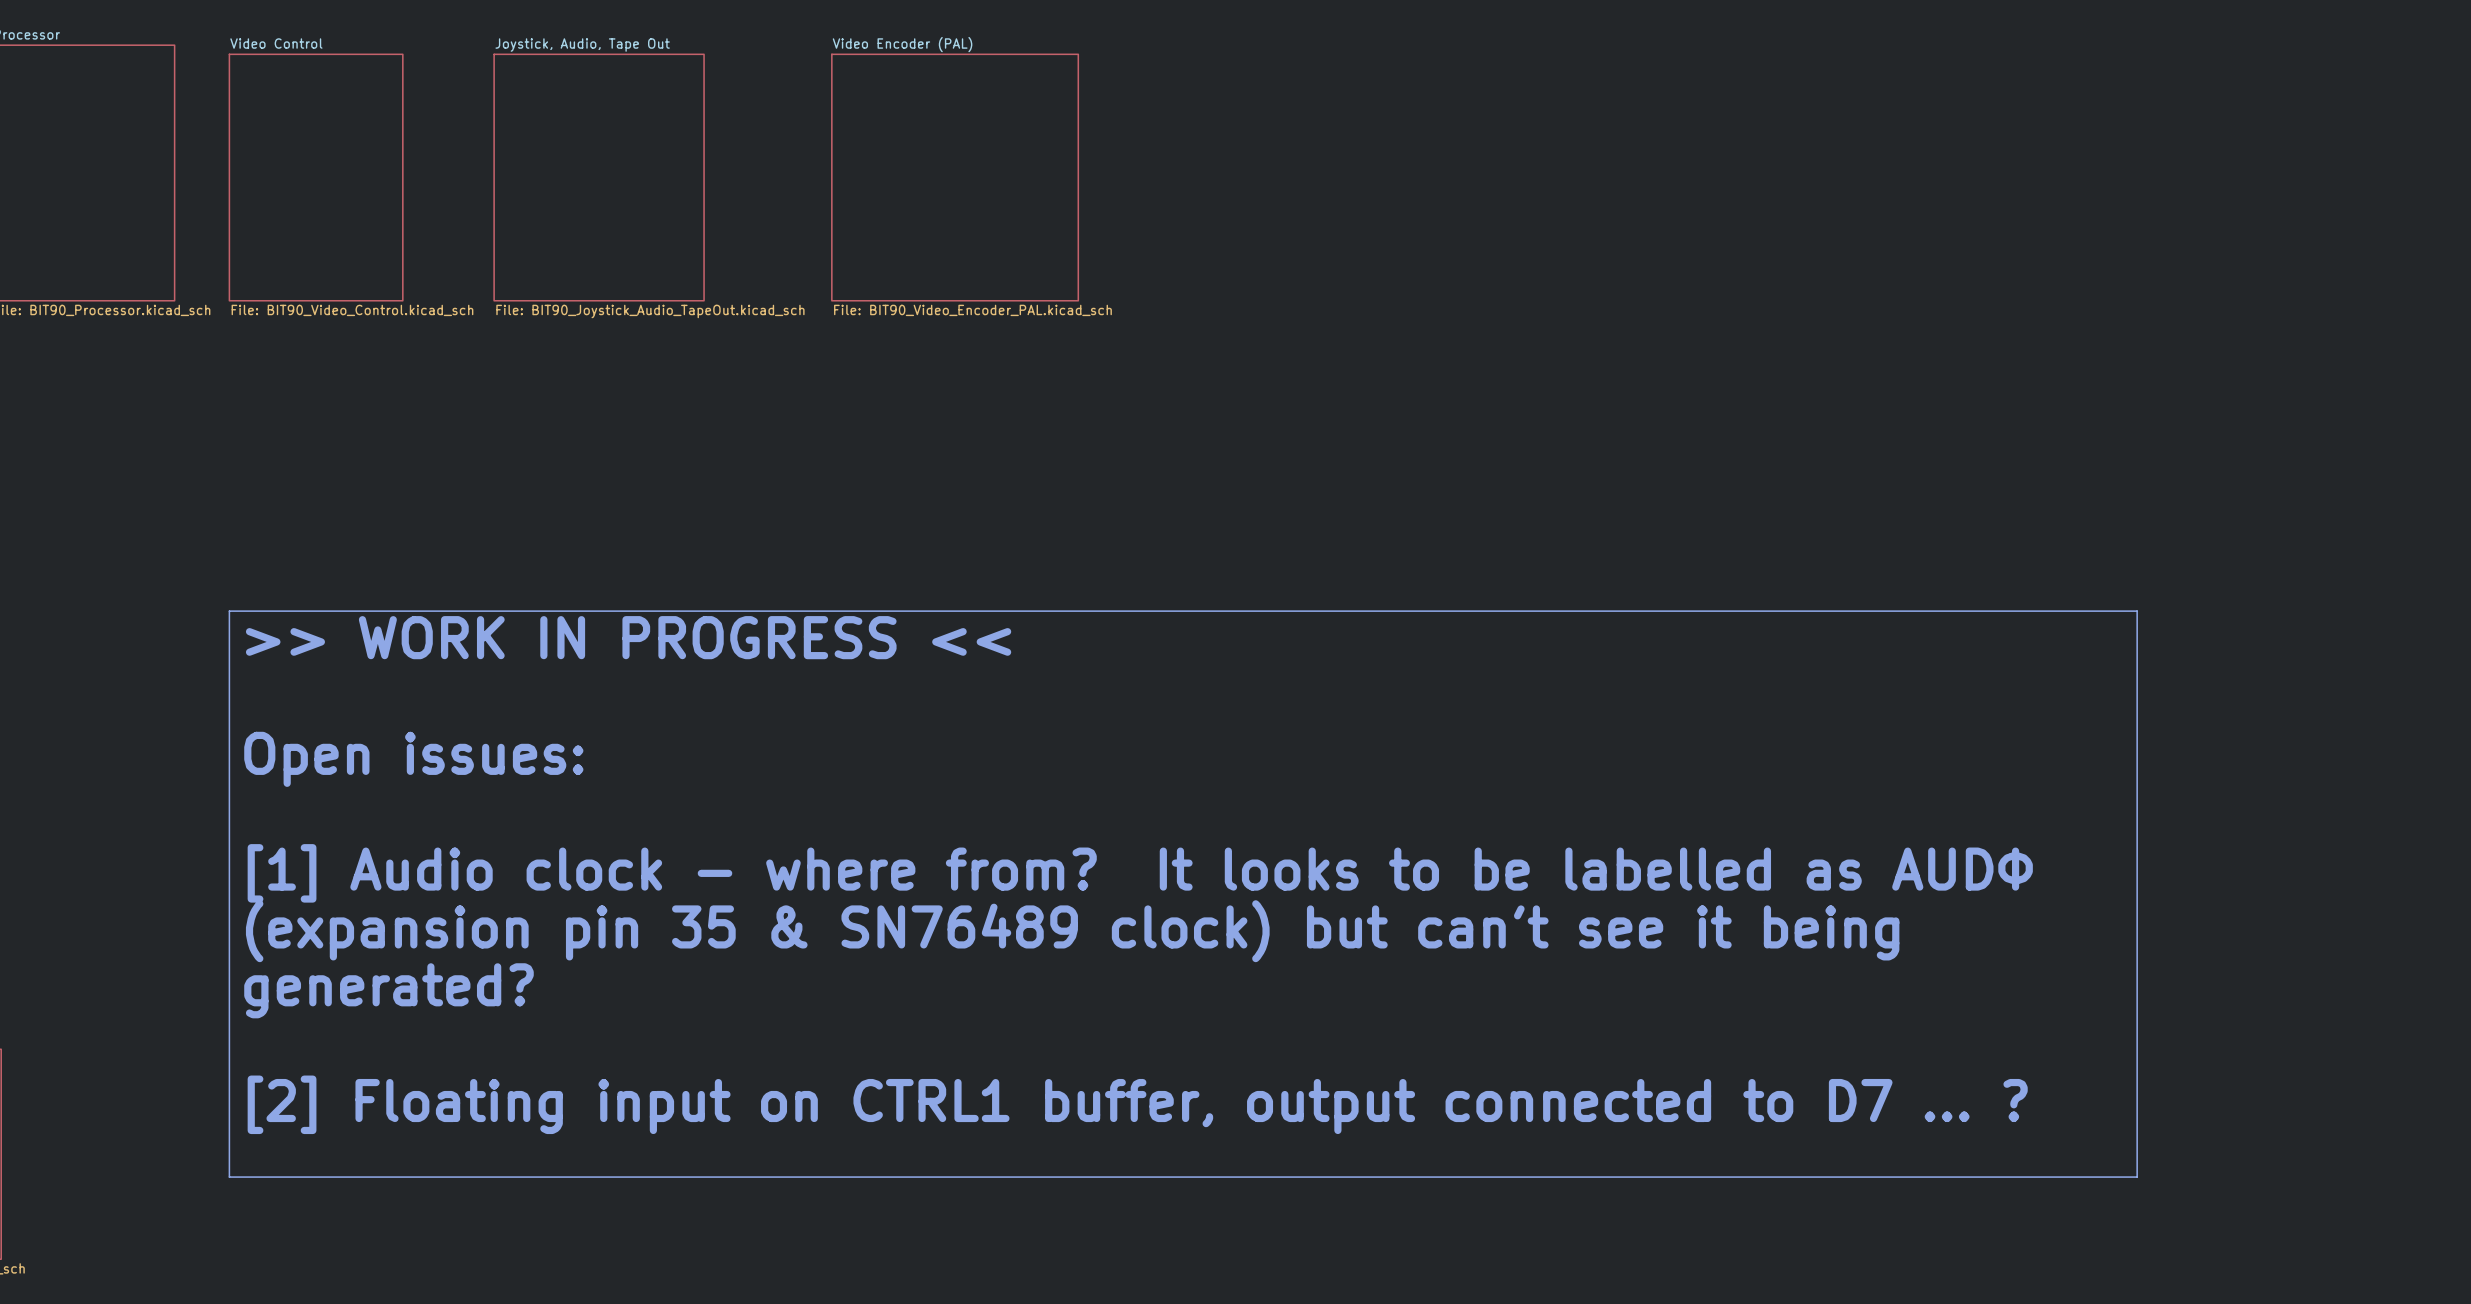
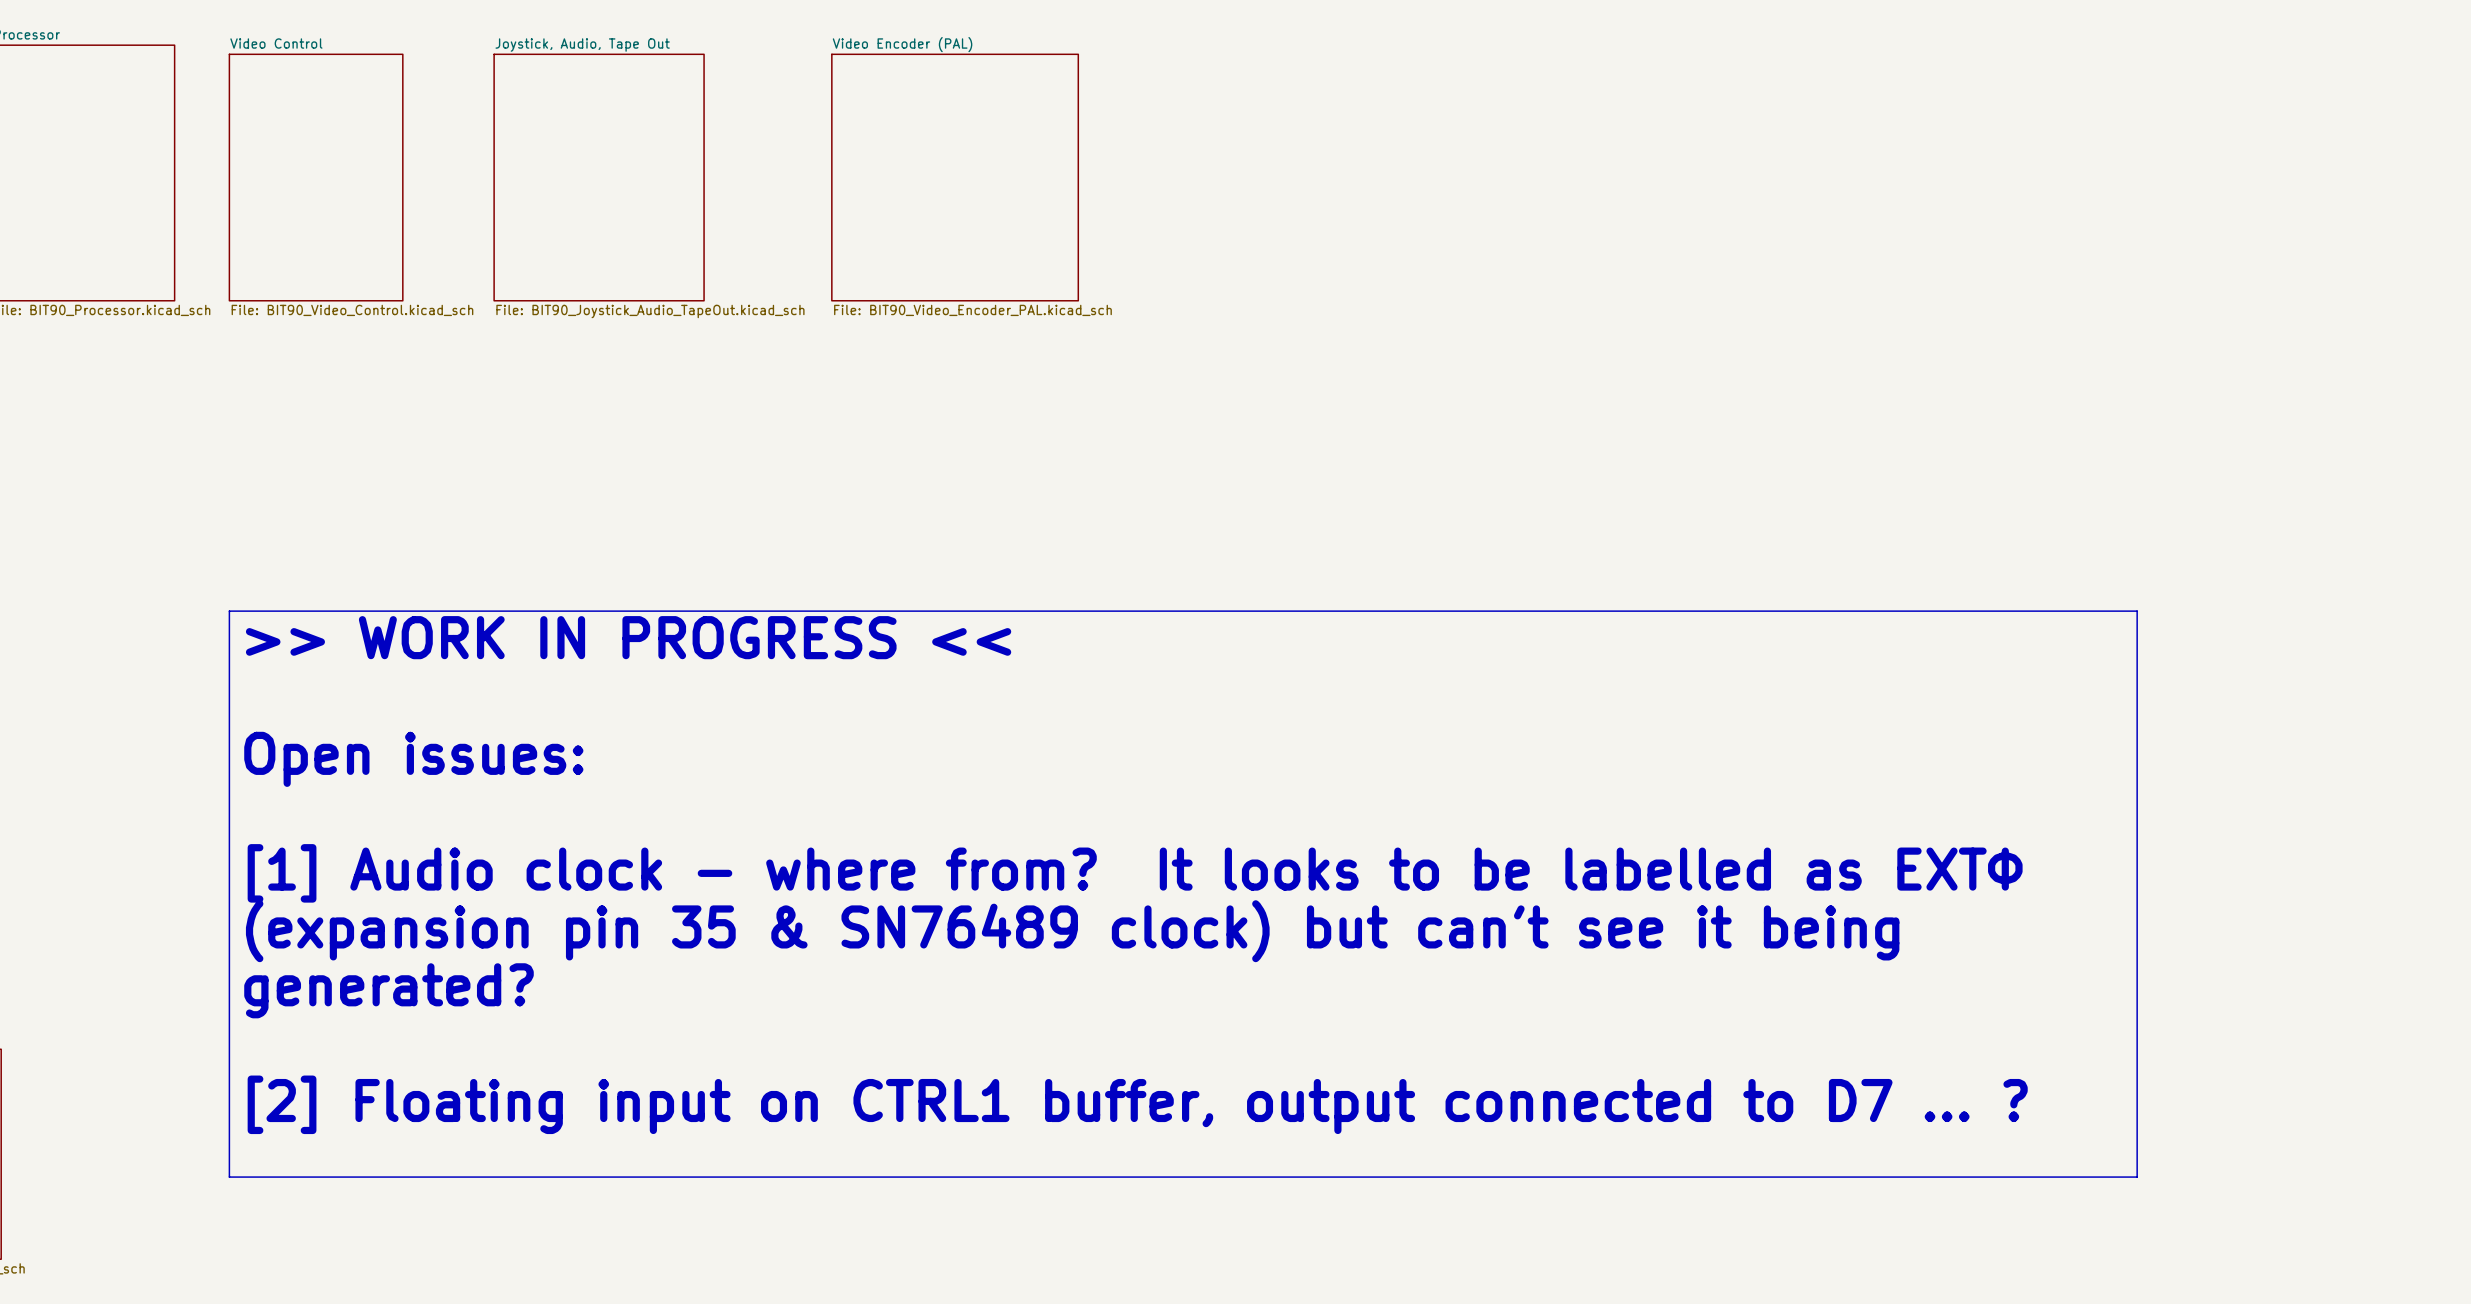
text: [1] Audio clock - where from? It looks to be labelled as AUDΦ (1140, 873) -> [1] Audio clock - where from? It looks to be labelled as EXTΦ (1135, 873)

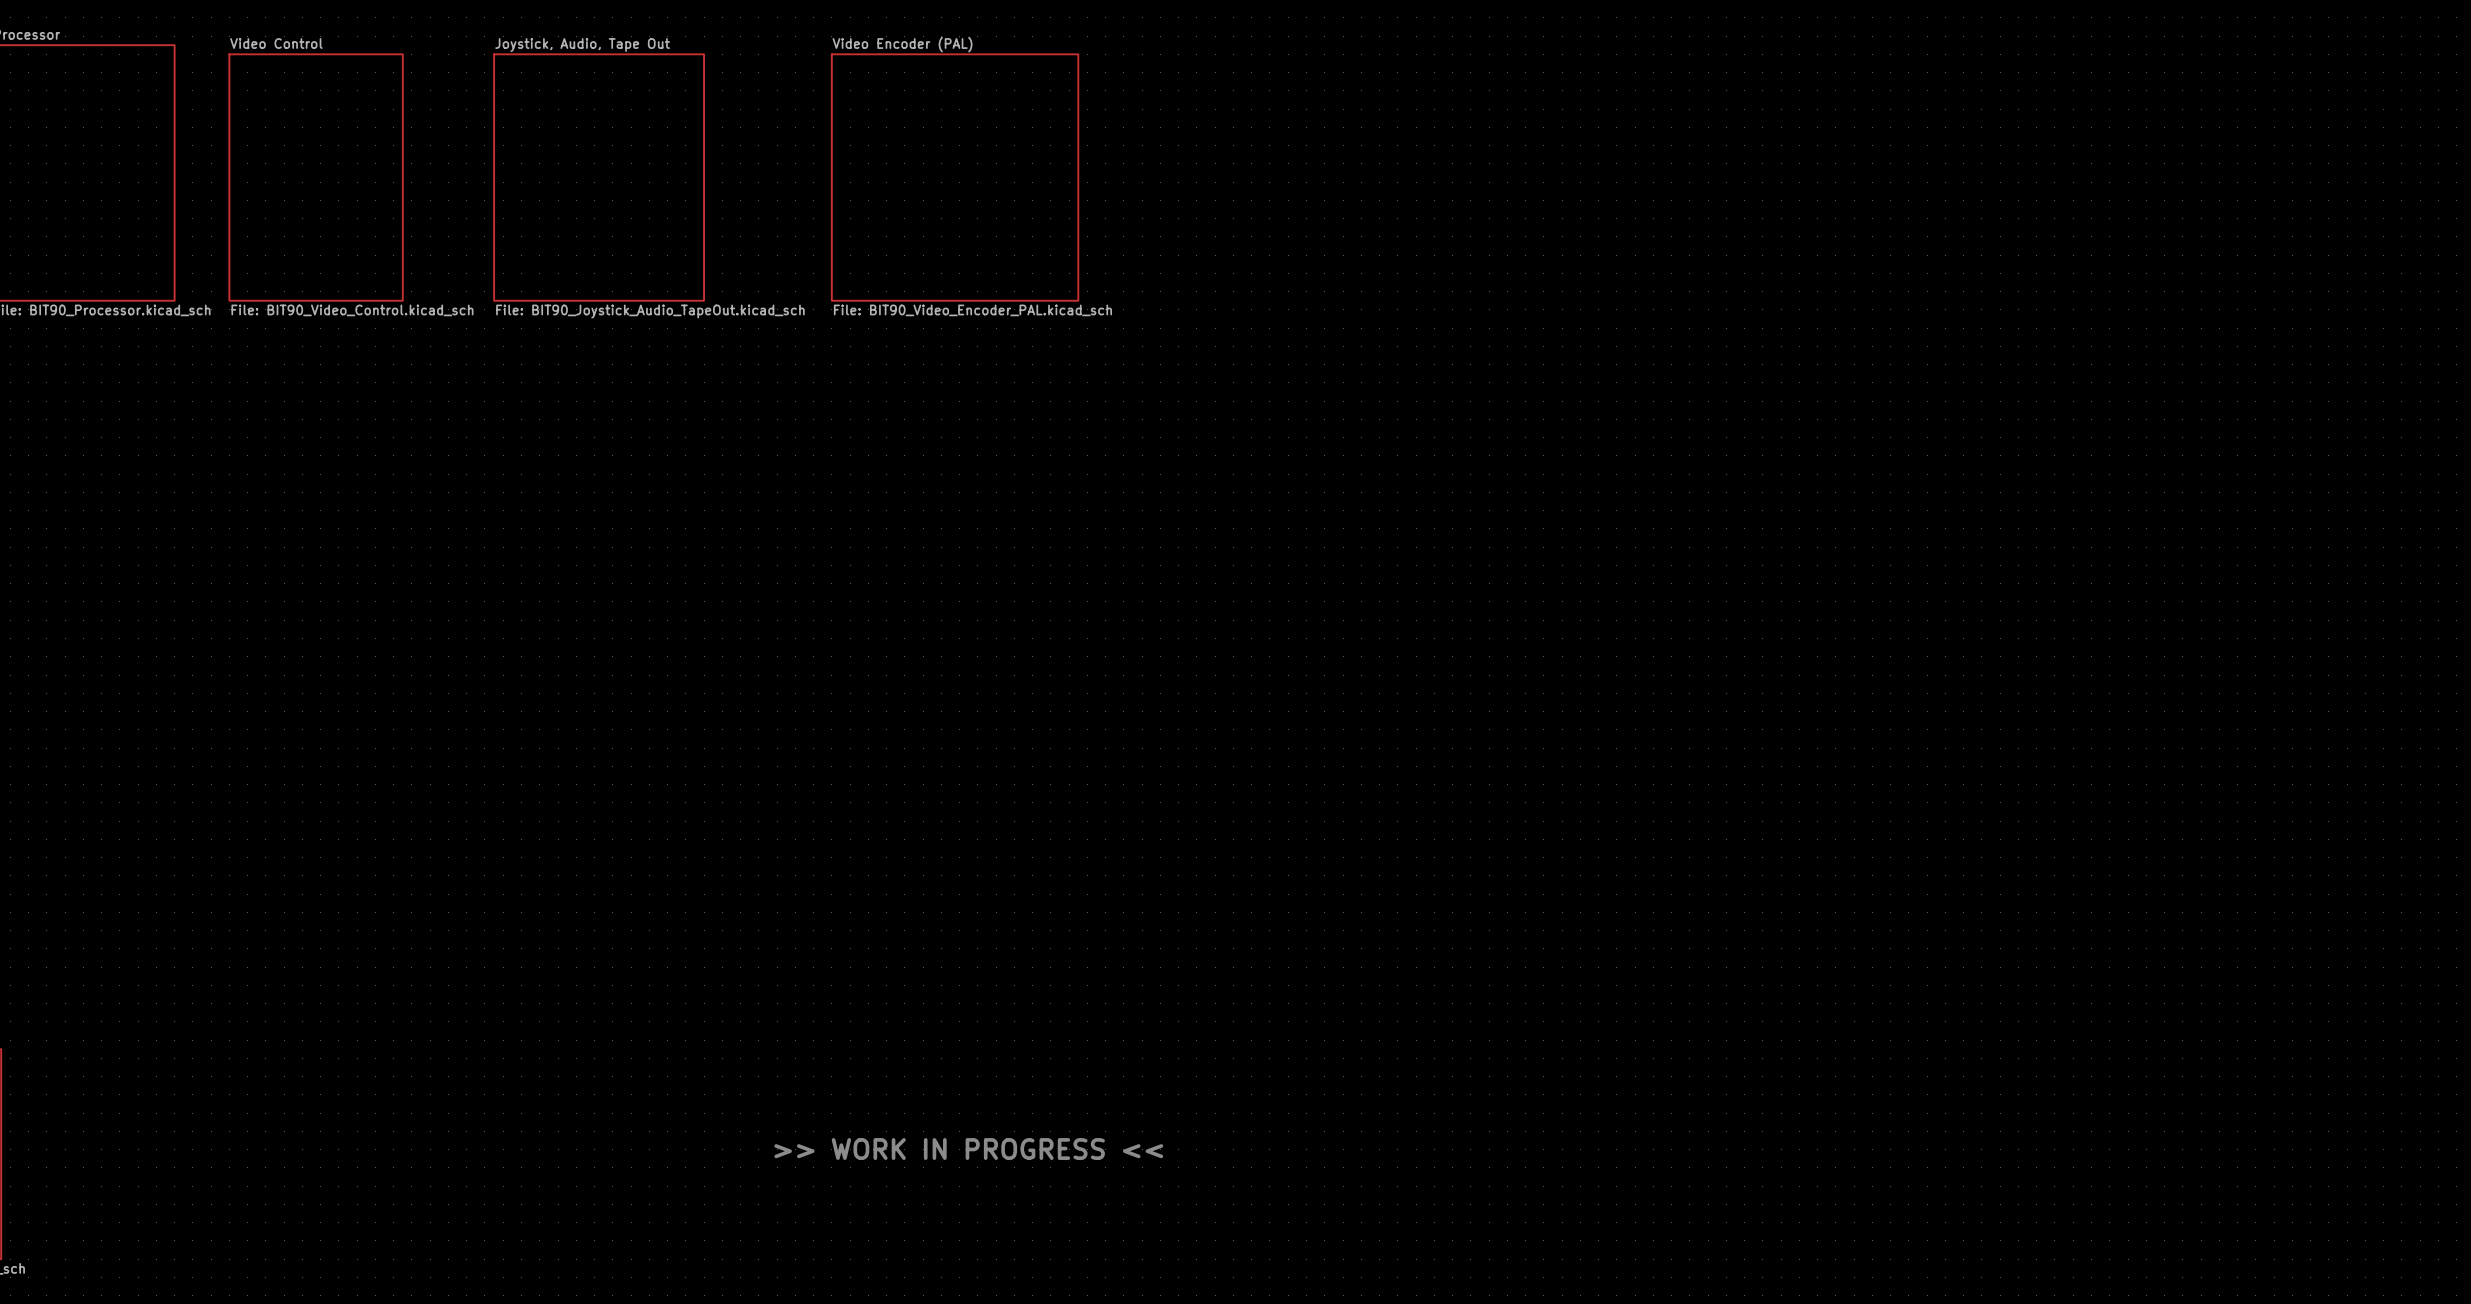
line: (229, 611) (2137, 611) (2137, 1177) (229, 1177) (229, 611) -> none
text: >> WORK IN PROGRESS << (628, 637) -> none
text: Open issues: (413, 759) -> none
text: [1] Audio clock - where from? It looks to be labelled as EXTΦ (1135, 873) -> none
text: (expansion pin 35 & SN76489 clock) but can't see it being (1072, 931) -> none
text: generated? (388, 990) -> none
text: [2] Floating input on CTRL1 buffer, output connected to D7 ... ? (1137, 1104) -> none
text: none -> >> WORK IN PROGRESS << (968, 1149)

